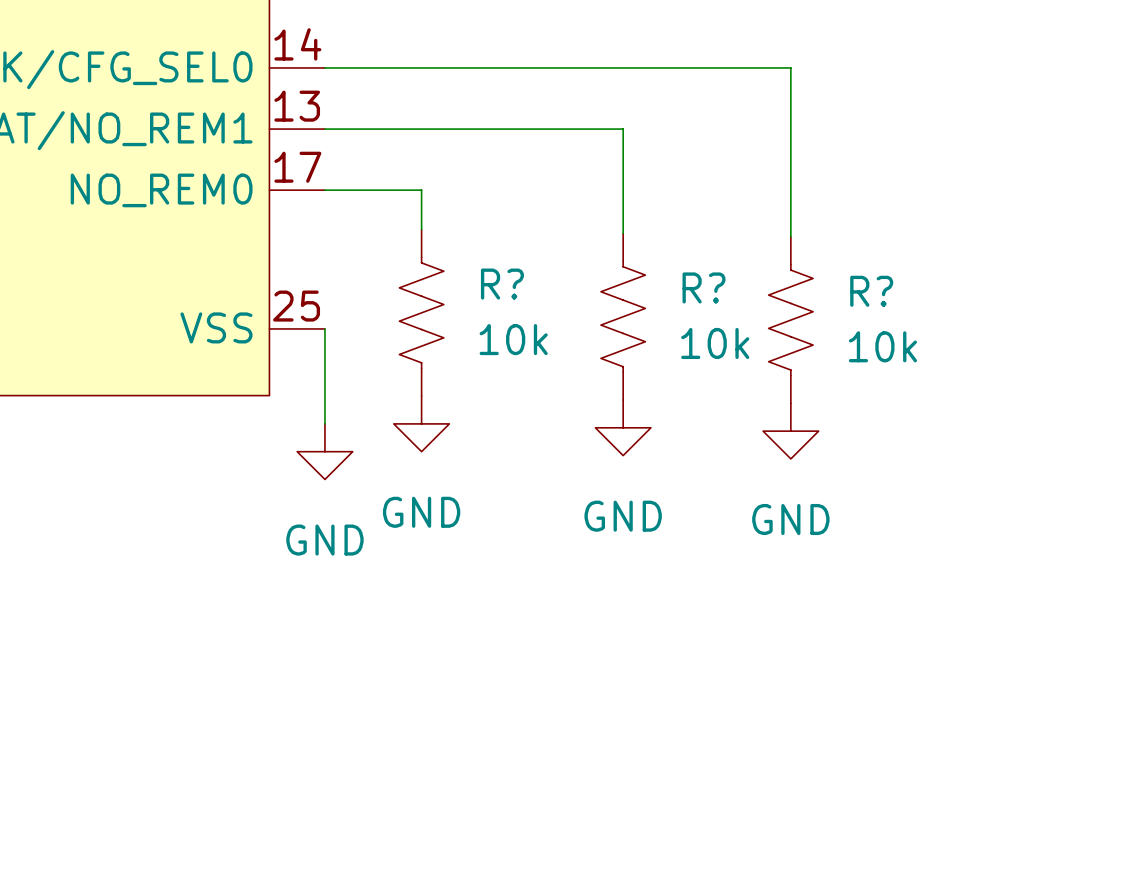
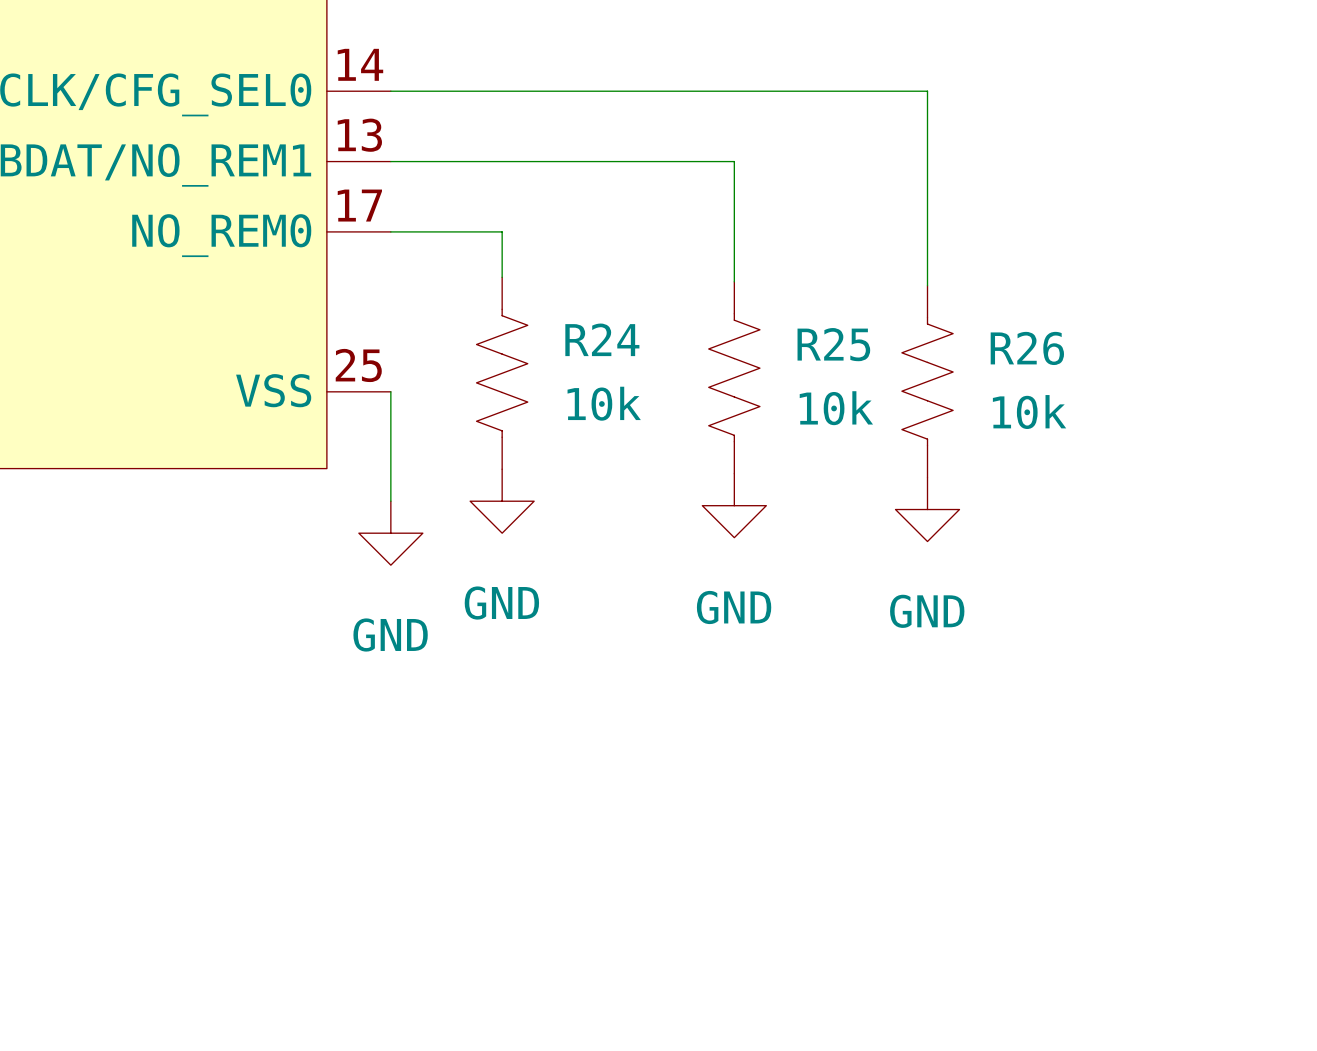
R? name: R? (502, 284) -> R24 (602, 339)
R? name: R? (703, 287) -> R25 (833, 344)
R? name: R? (871, 291) -> R26 (1027, 348)

